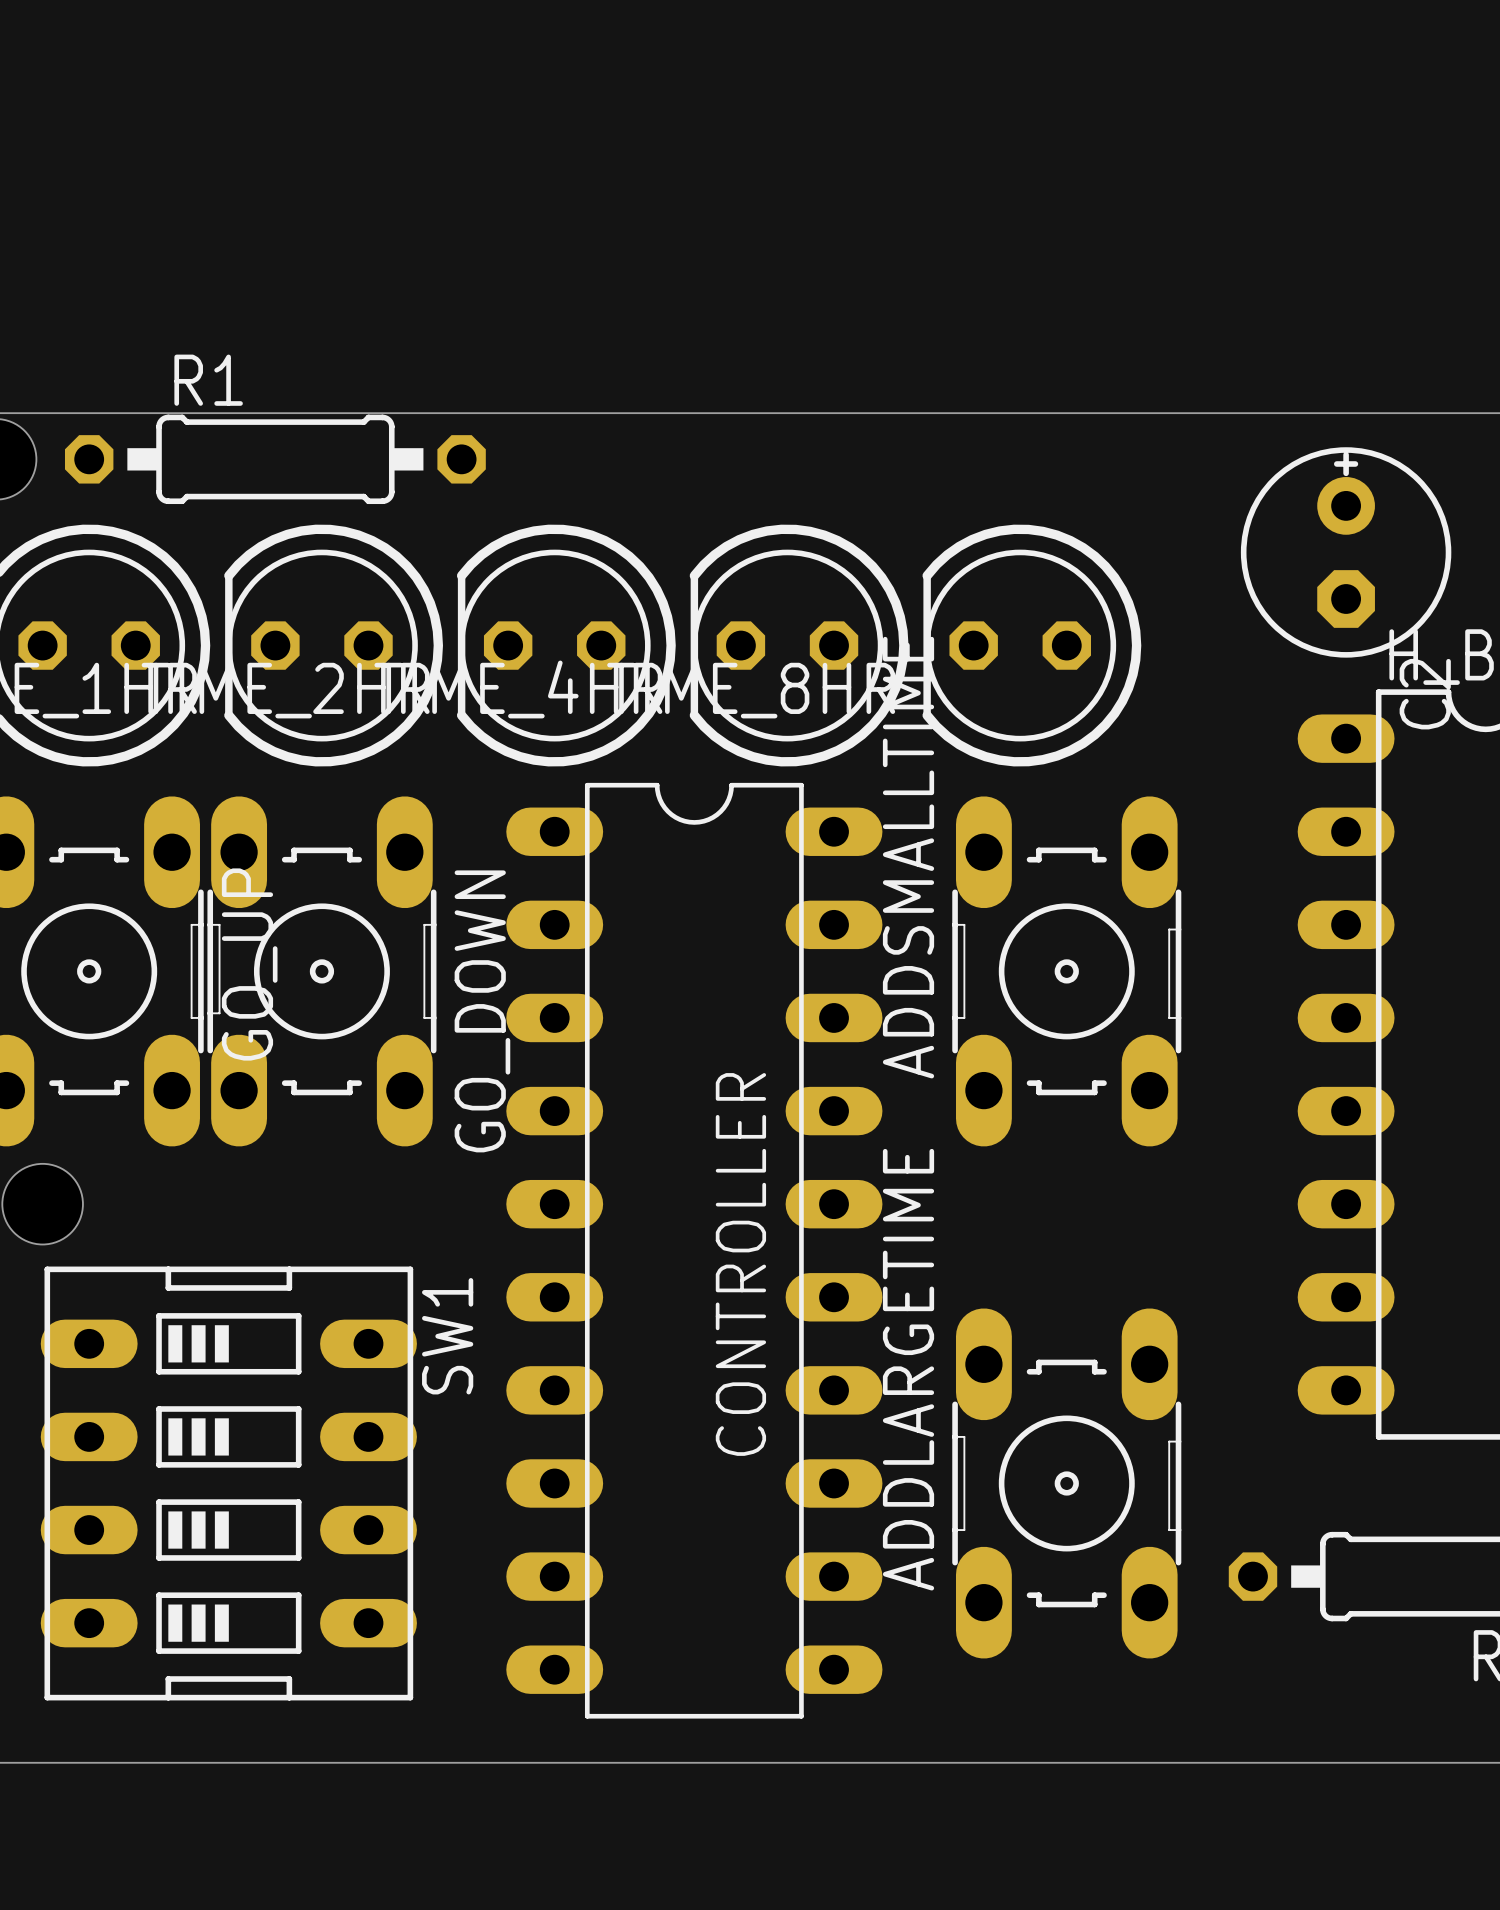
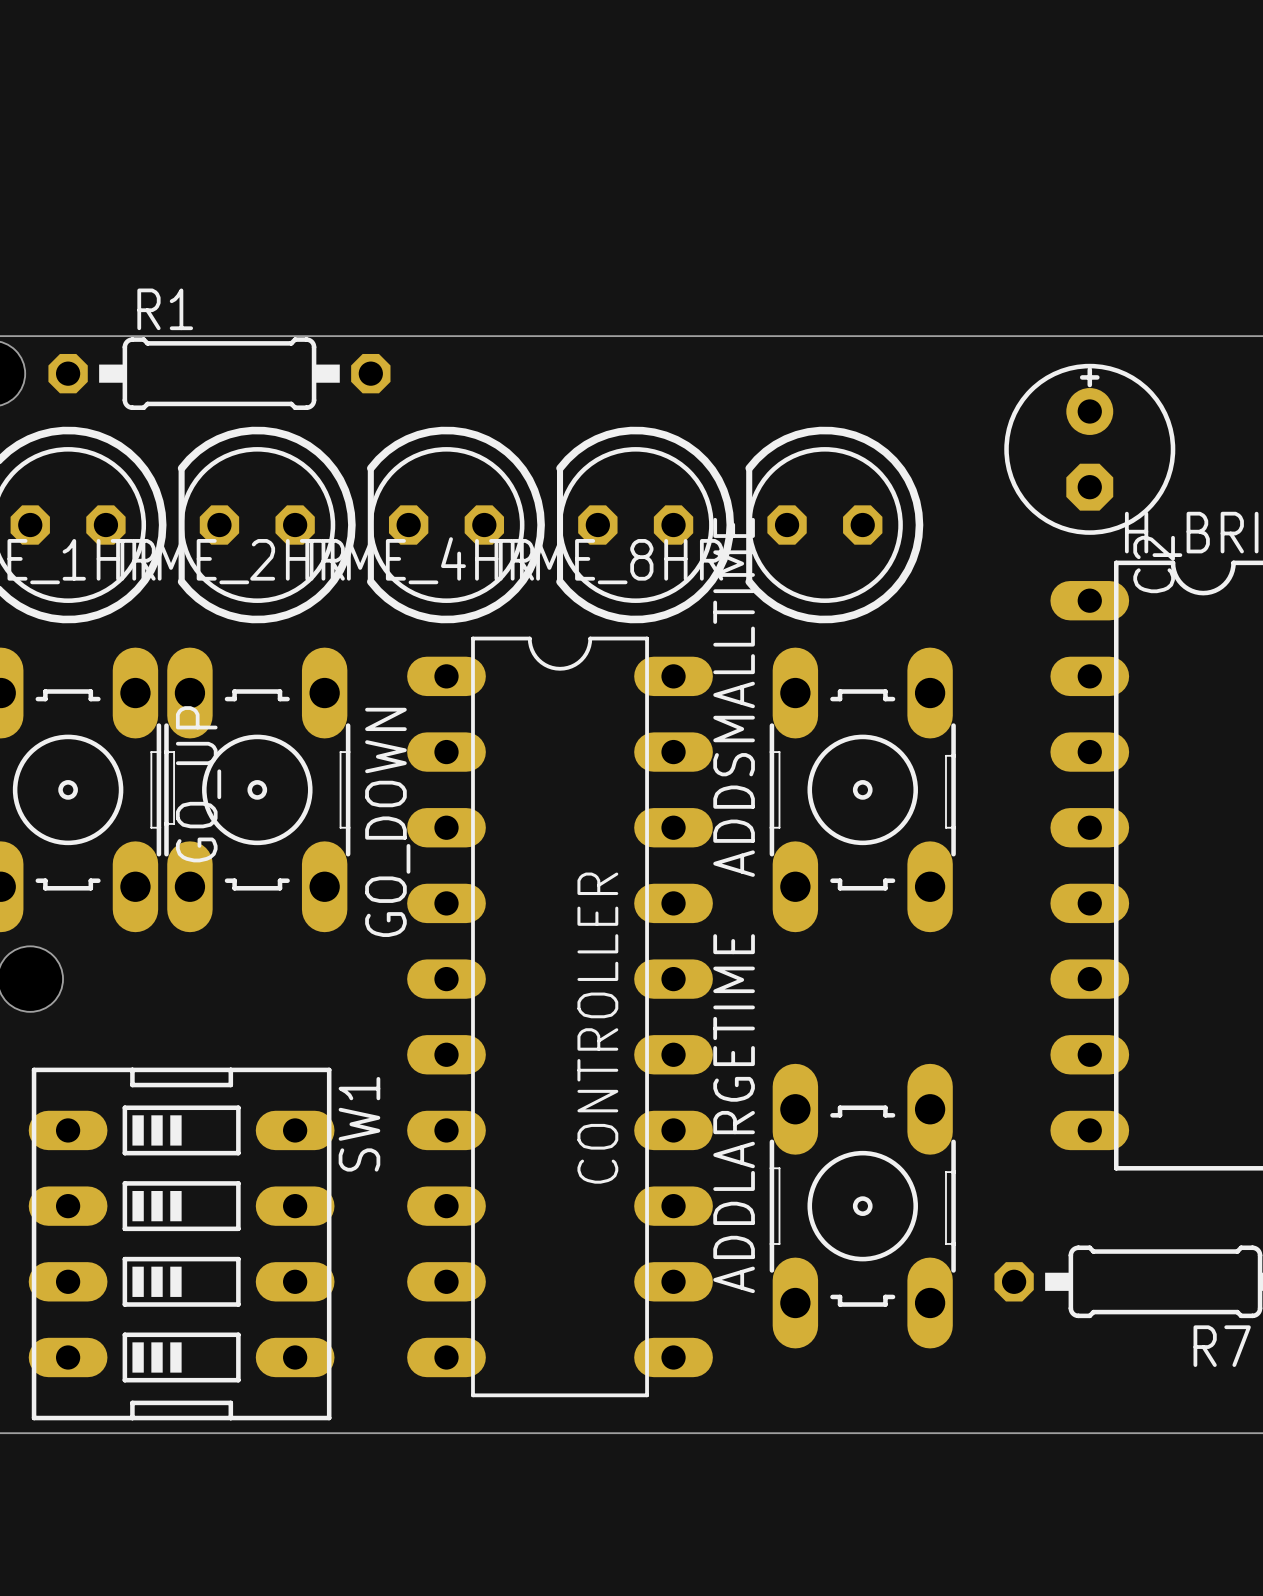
SW1 position: (228, 1483) -> (181, 1243)

